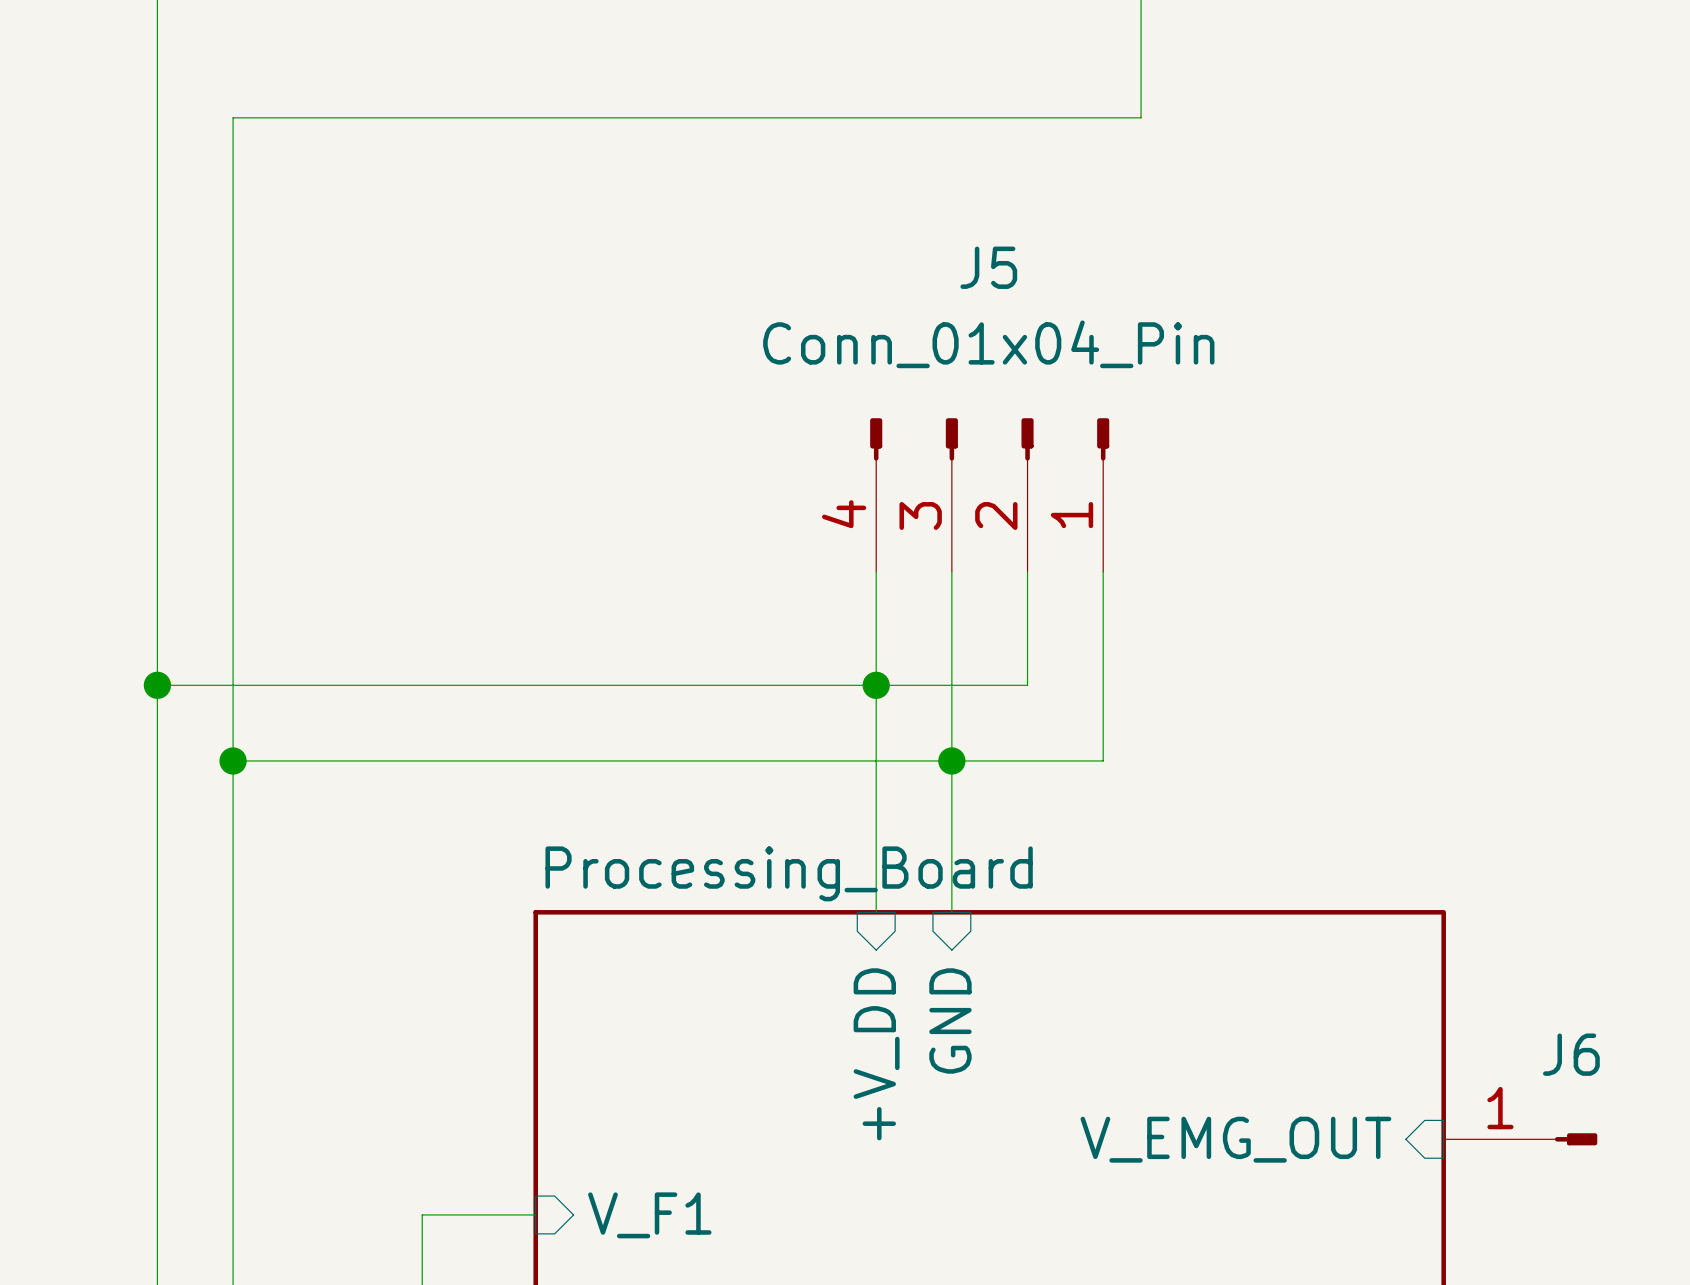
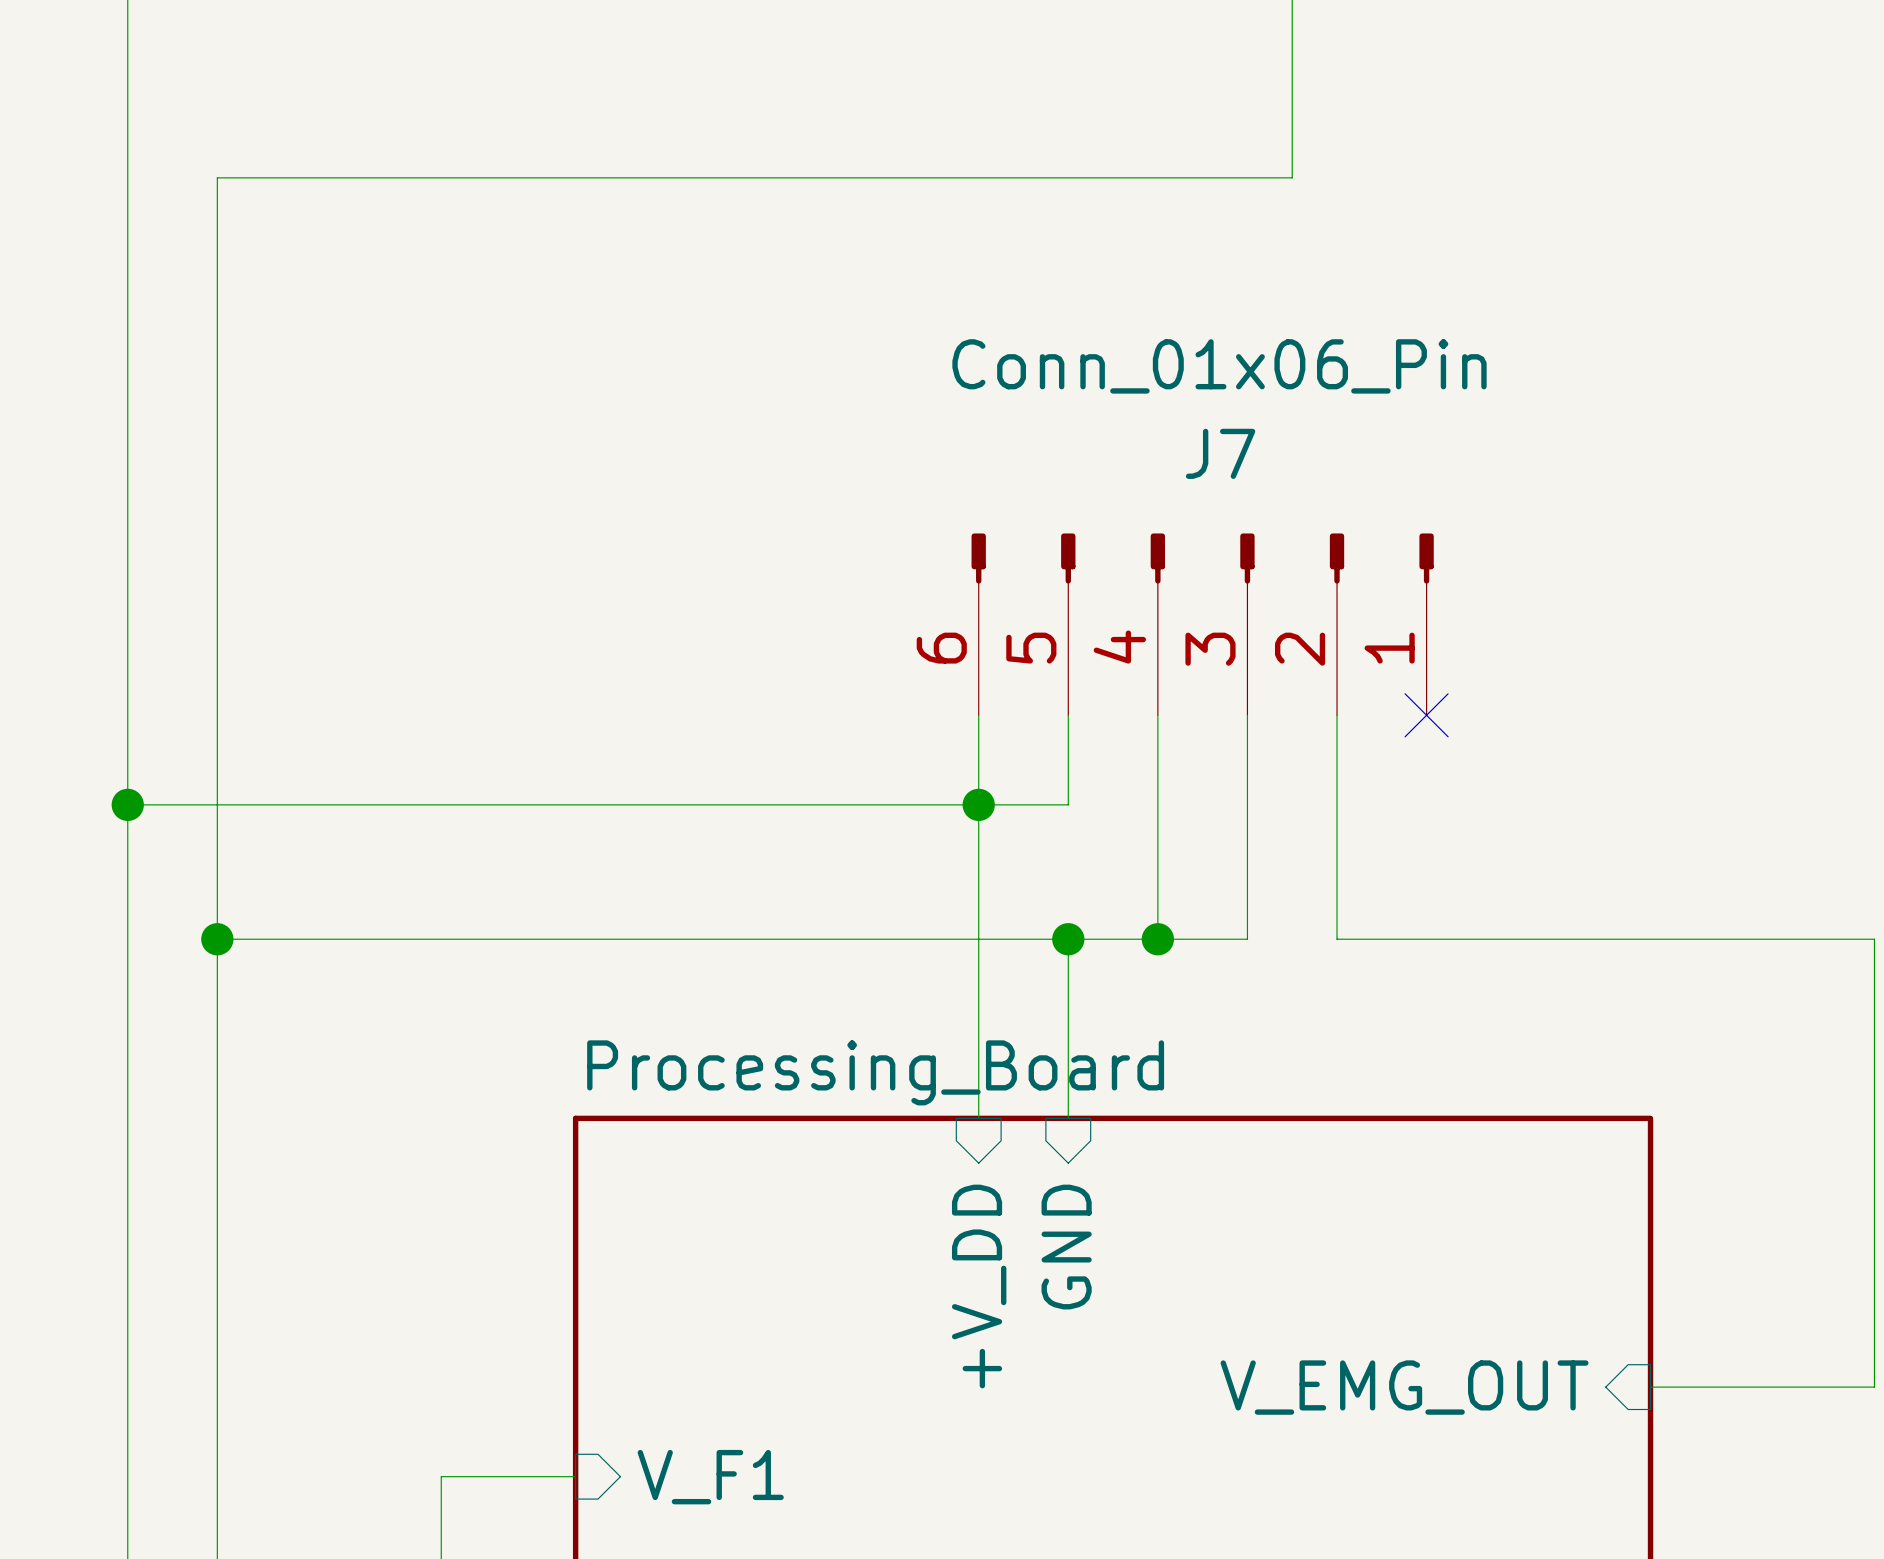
J5: Conn_01x04_Pin (989, 495) -> none
J7: none -> Conn_01x06_Pin (1202, 624)
wire: none -> (1337, 715) (1337, 939) (1874, 939) (1874, 1387) (1650, 1387)
no-connect mark: none -> (1426, 715)
wire: (951, 647) (951, 760) -> (1068, 804) (127, 804)
wire: (157, 685) (1027, 685) -> (1157, 939) (1157, 849)
junction position: (157, 685) -> (127, 804)
junction position: (876, 685) -> (978, 804)
junction: none -> (1157, 939)
J6: (1520, 1139) -> none

